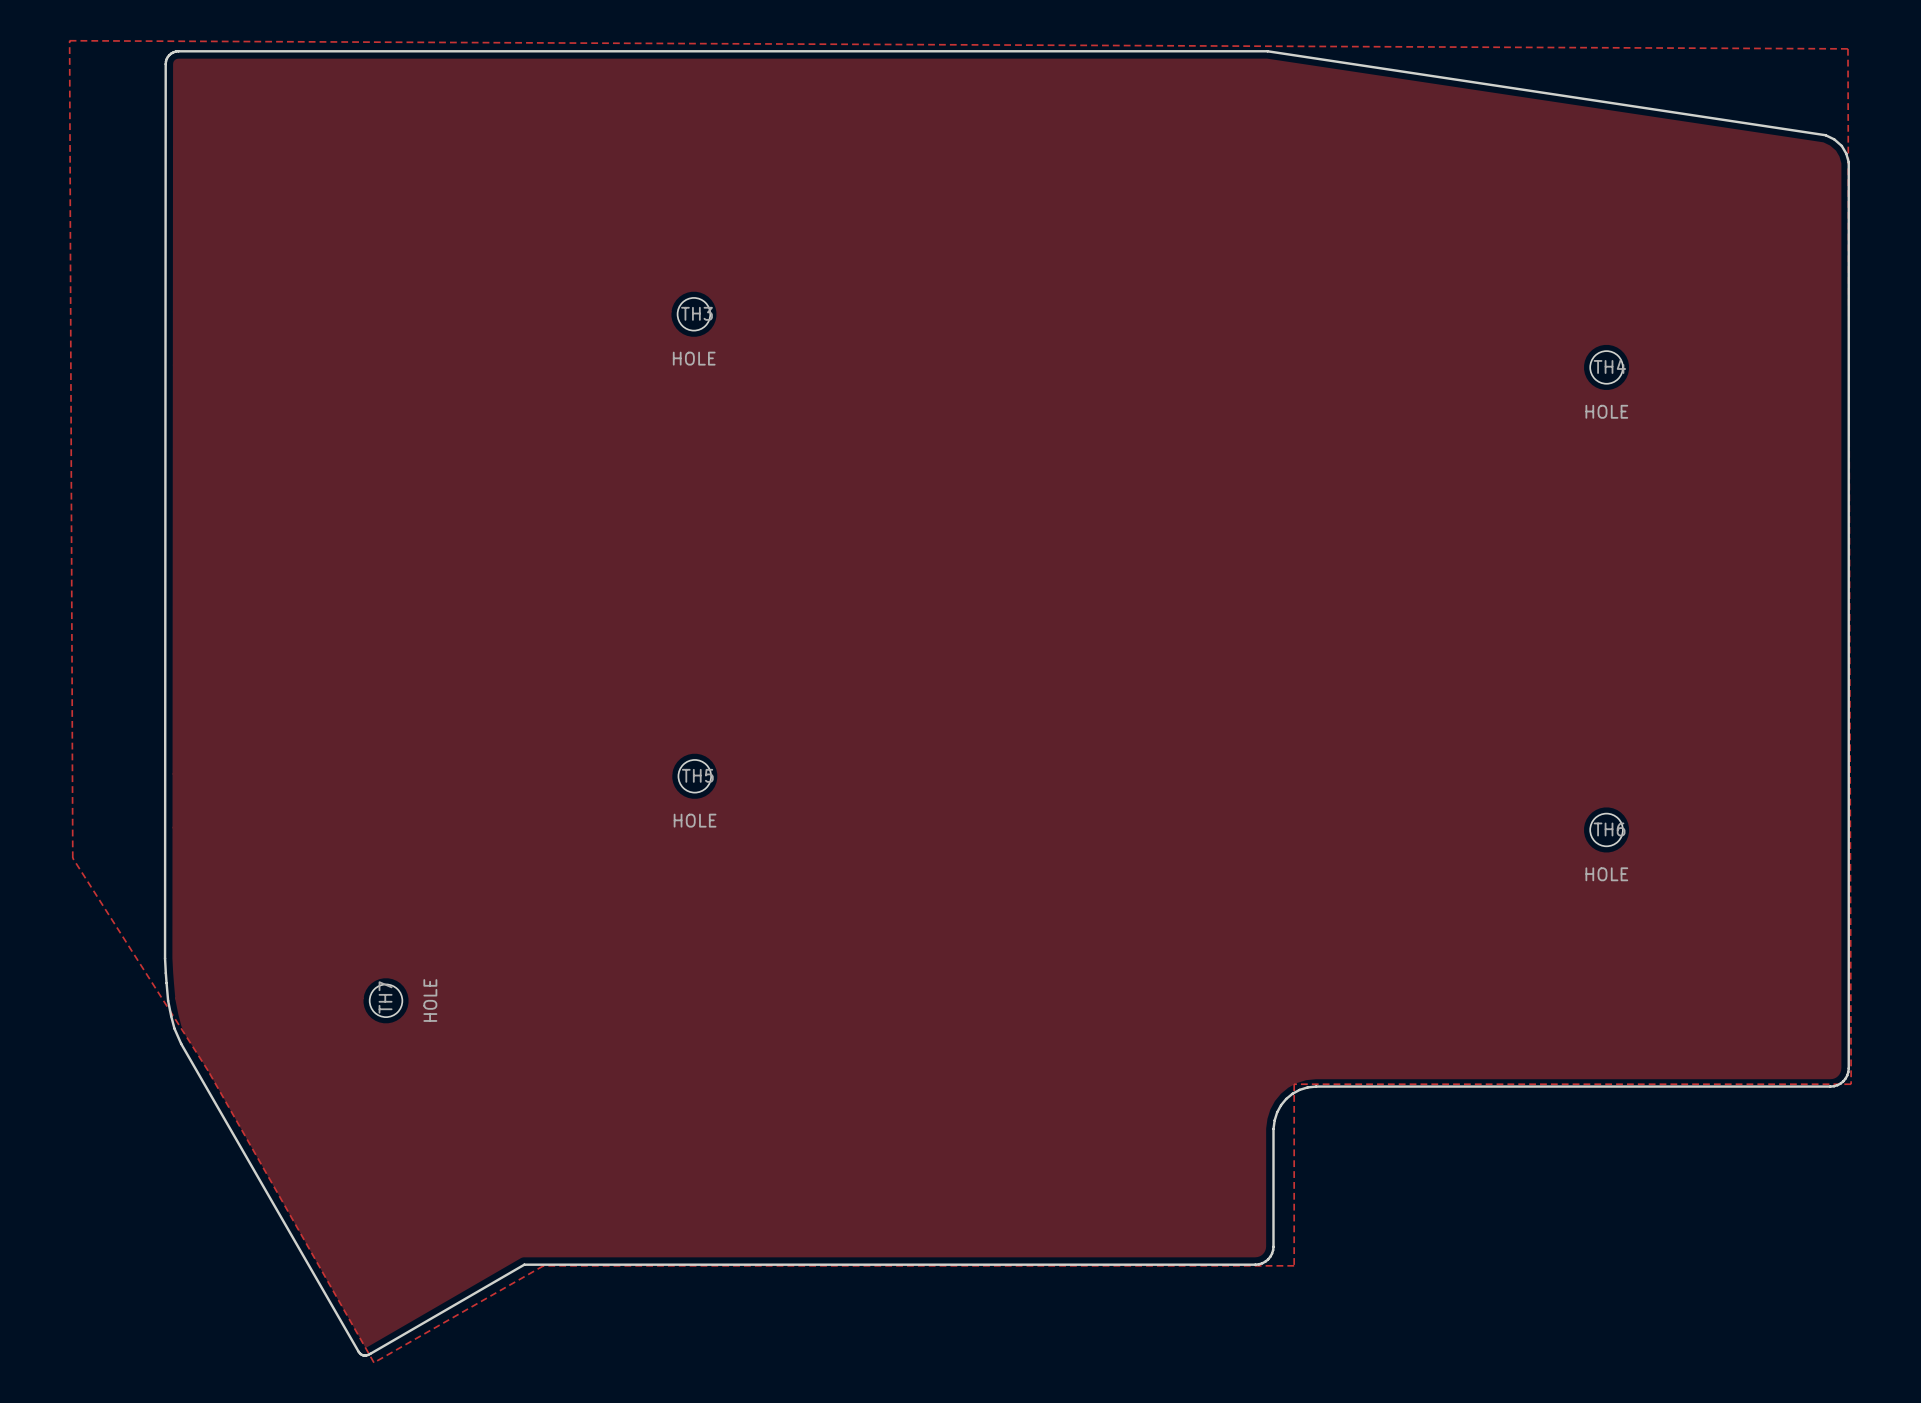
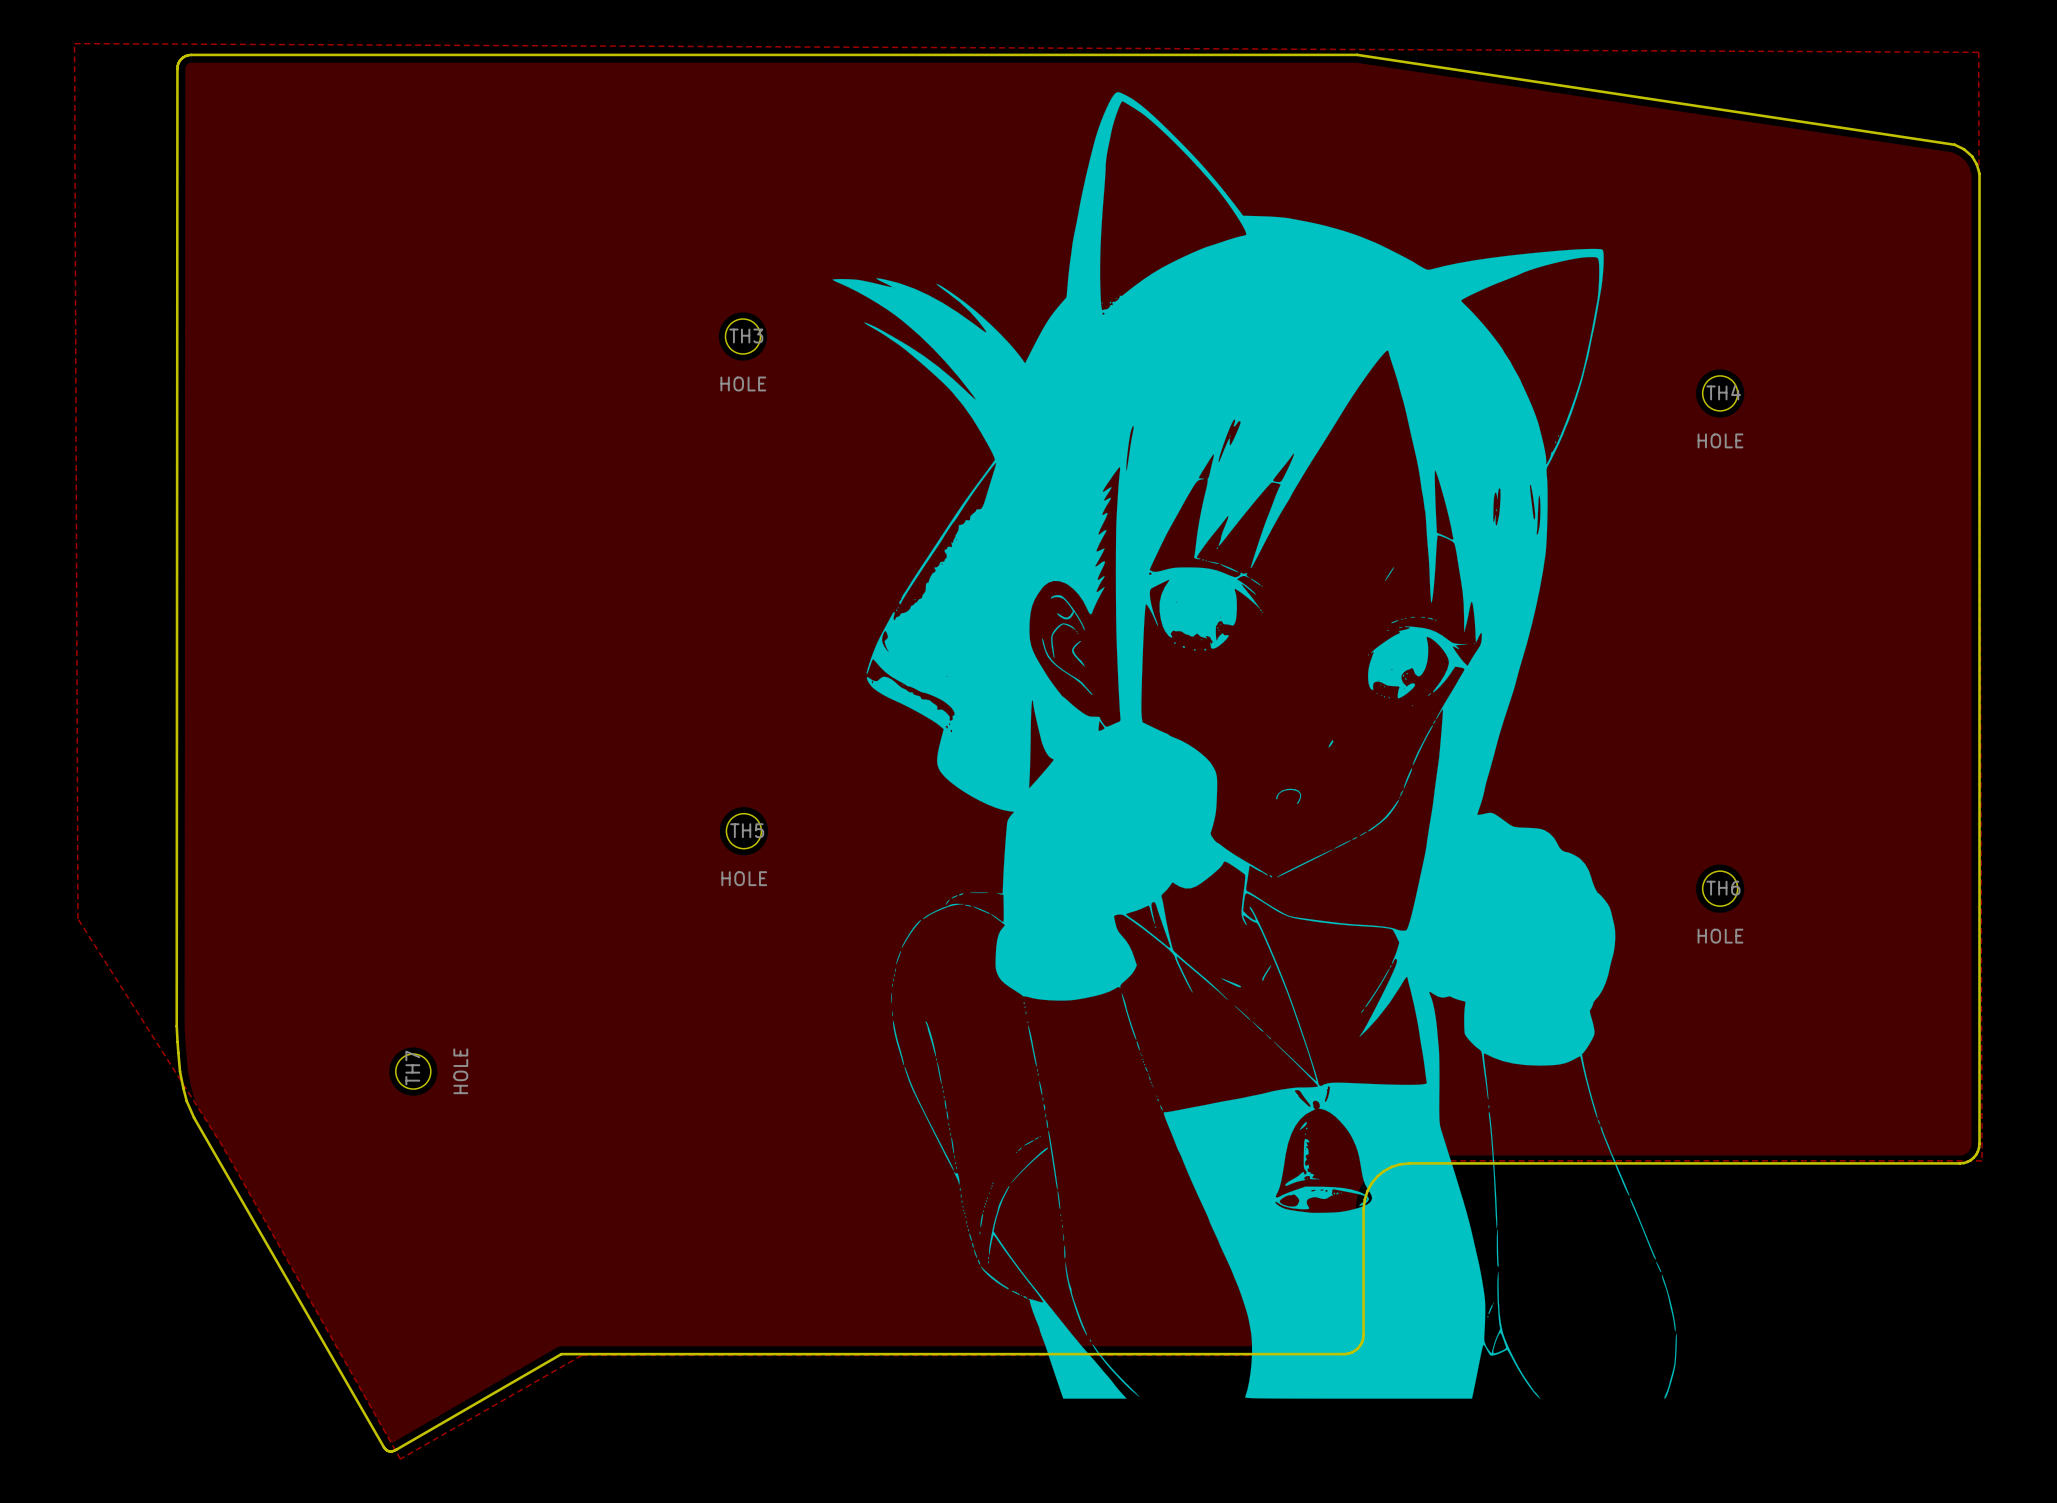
drawing: none -> [832, 92, 1677, 1400]

